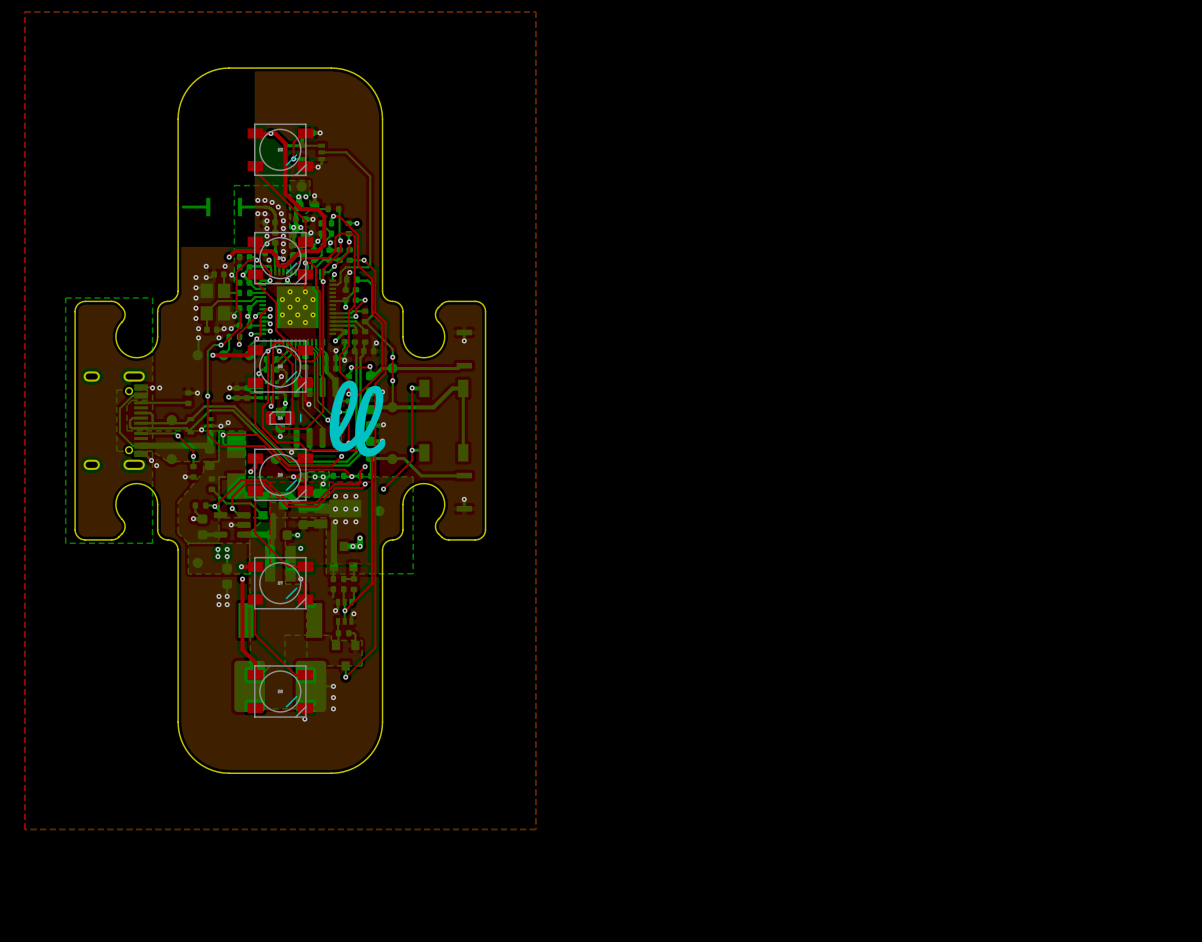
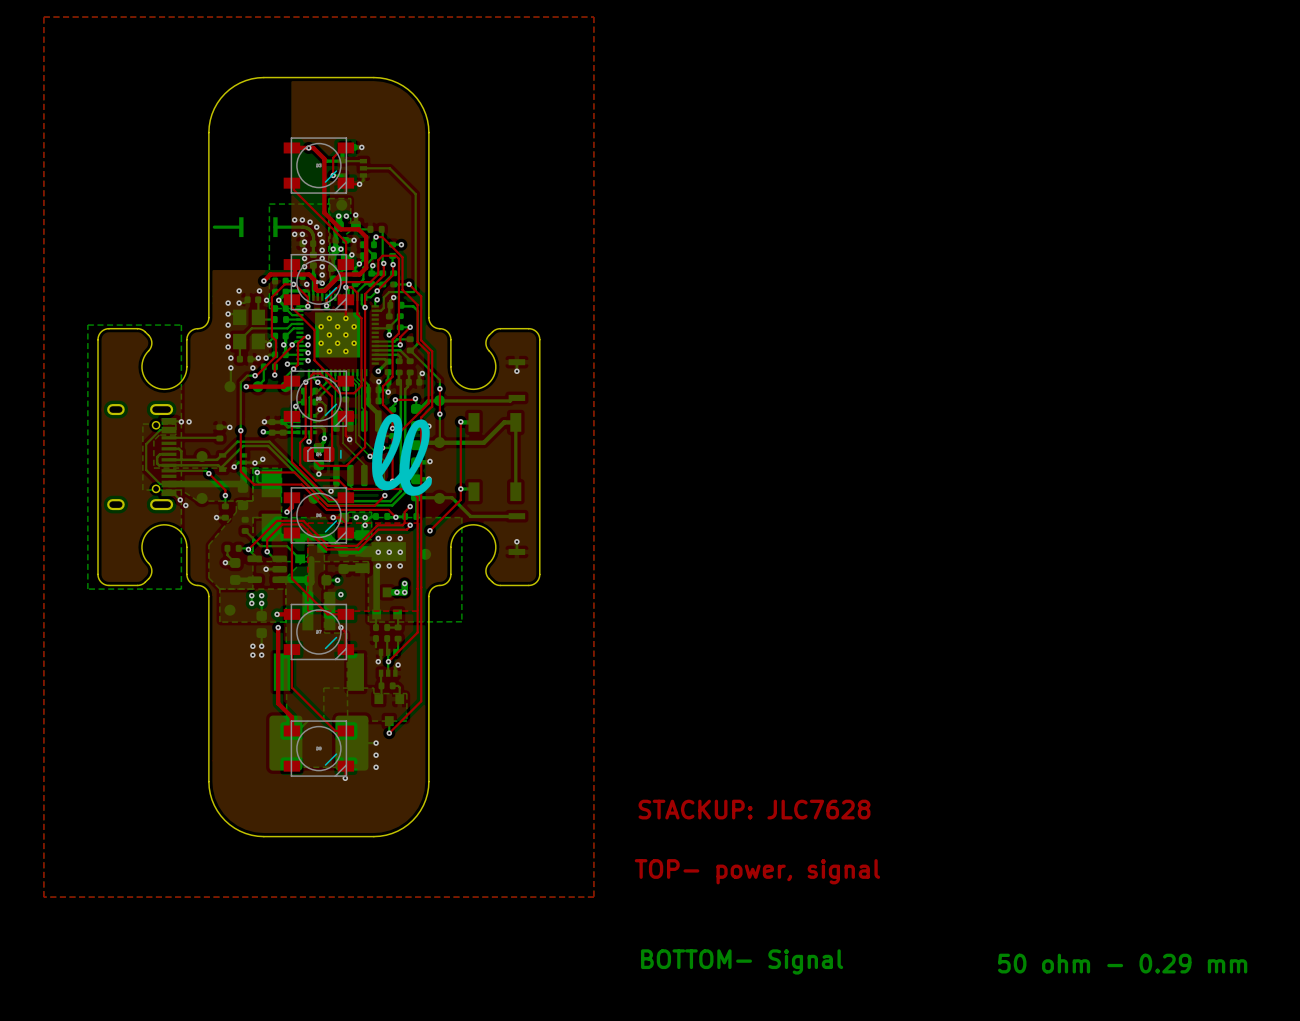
text: none -> STACKUP: JLC7628 (754, 809)
text: none -> TOP- power, signal (757, 871)
text: none -> BOTTOM- Signal (742, 961)
text: none -> 50 ohm - 0.29 mm (1122, 963)

